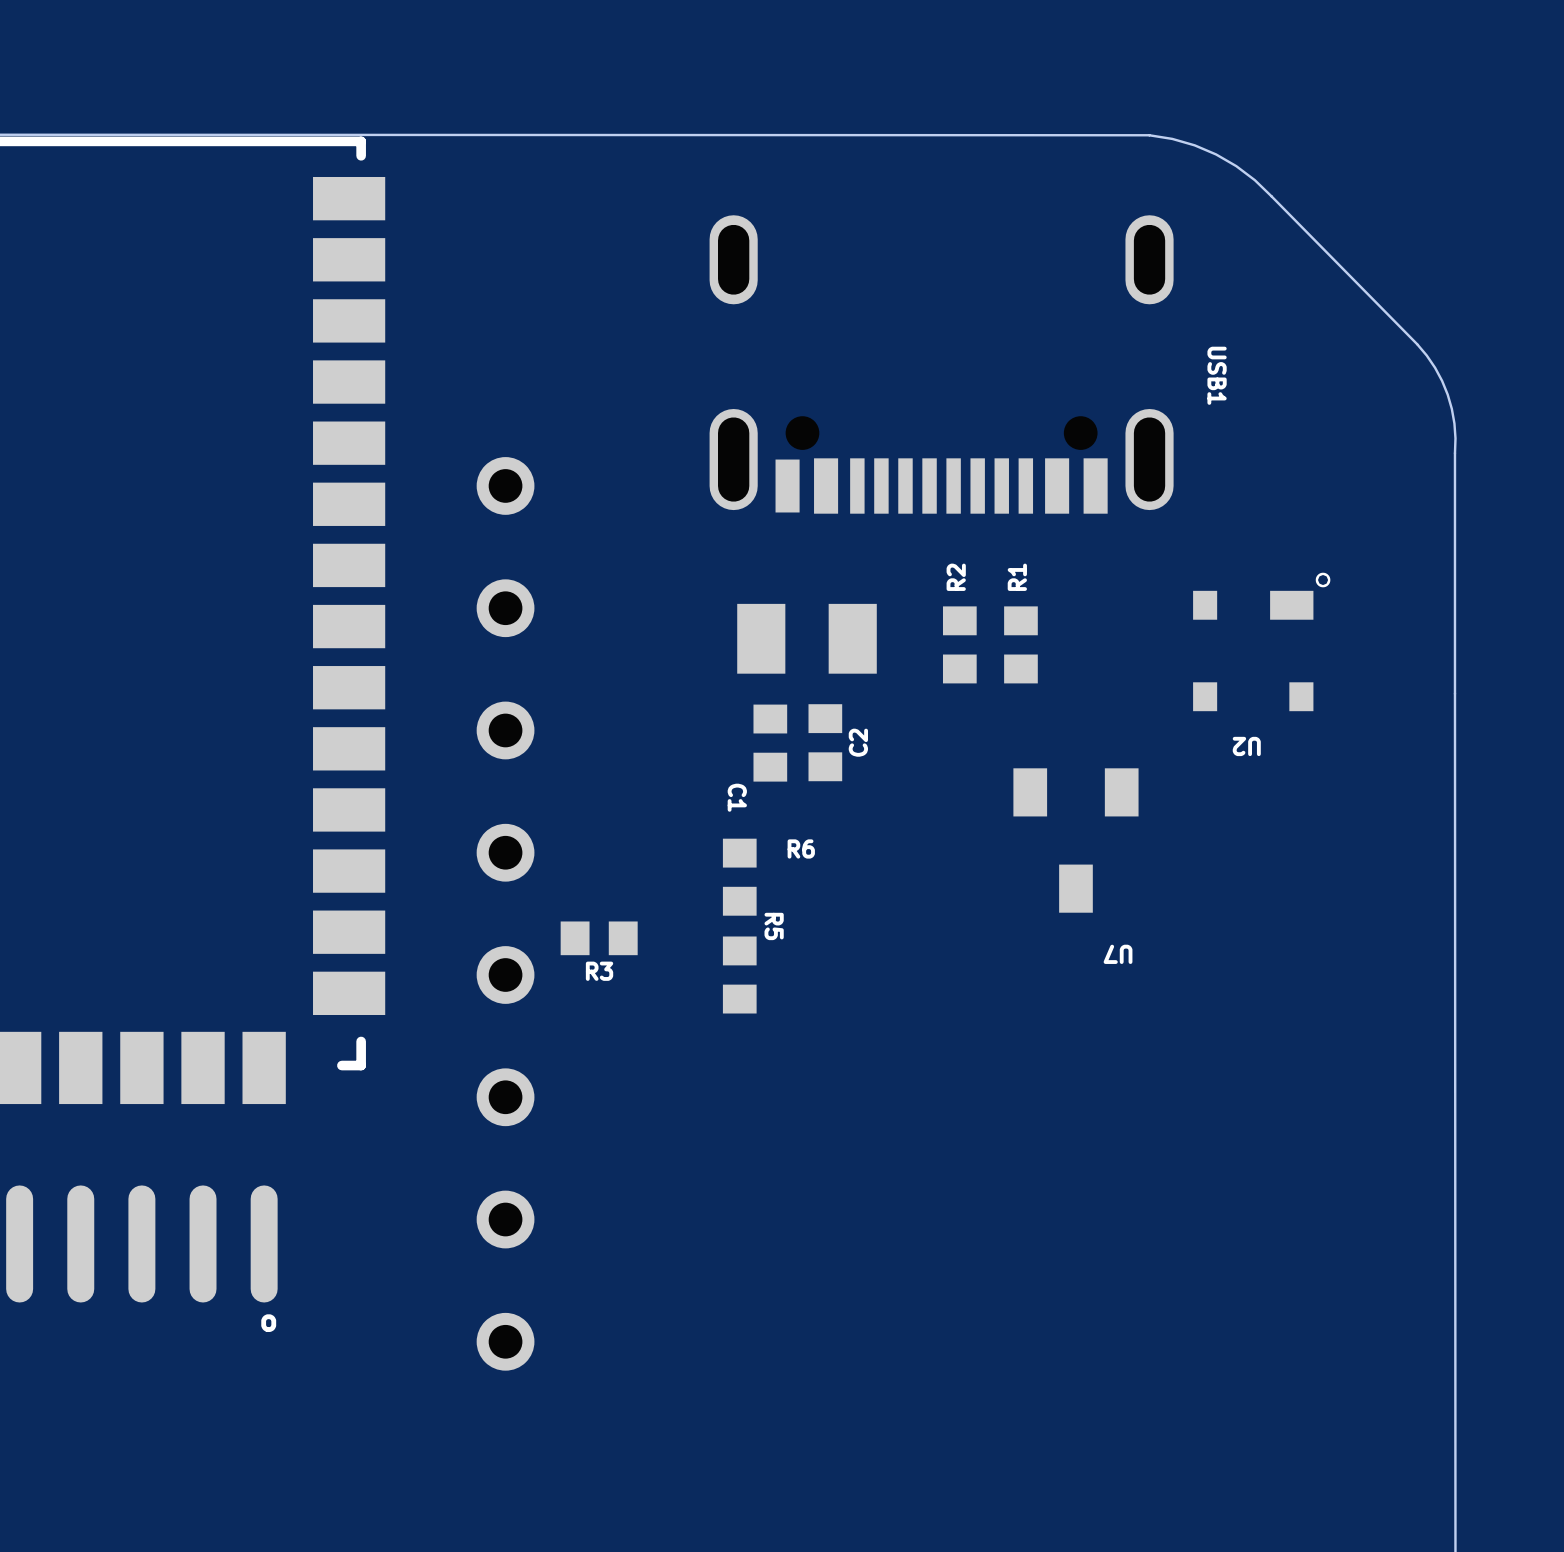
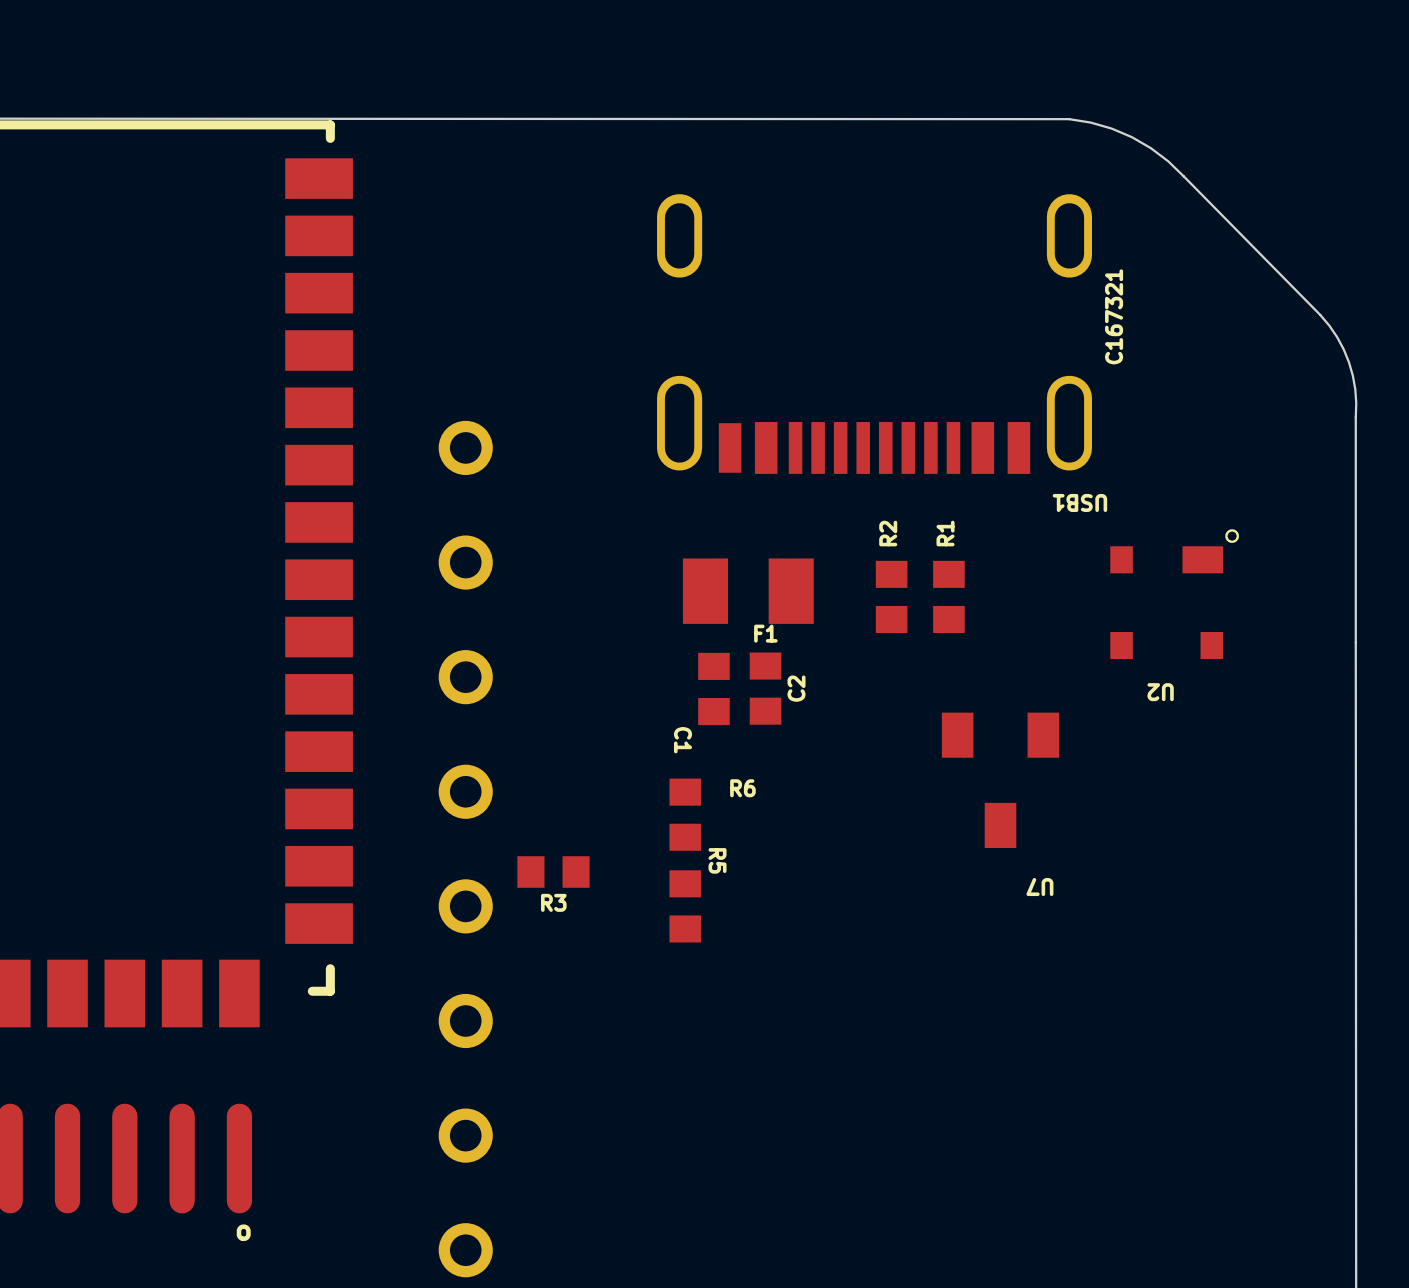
USB1 text: none -> C167321 (1114, 316)
USB1 name rotation: 0° (1217, 375) -> 90° clockwise (1079, 502)
USB1 name position: USB1 (1217, 375) -> USB1 (1079, 502)
F1 name: none -> F1 (765, 633)

